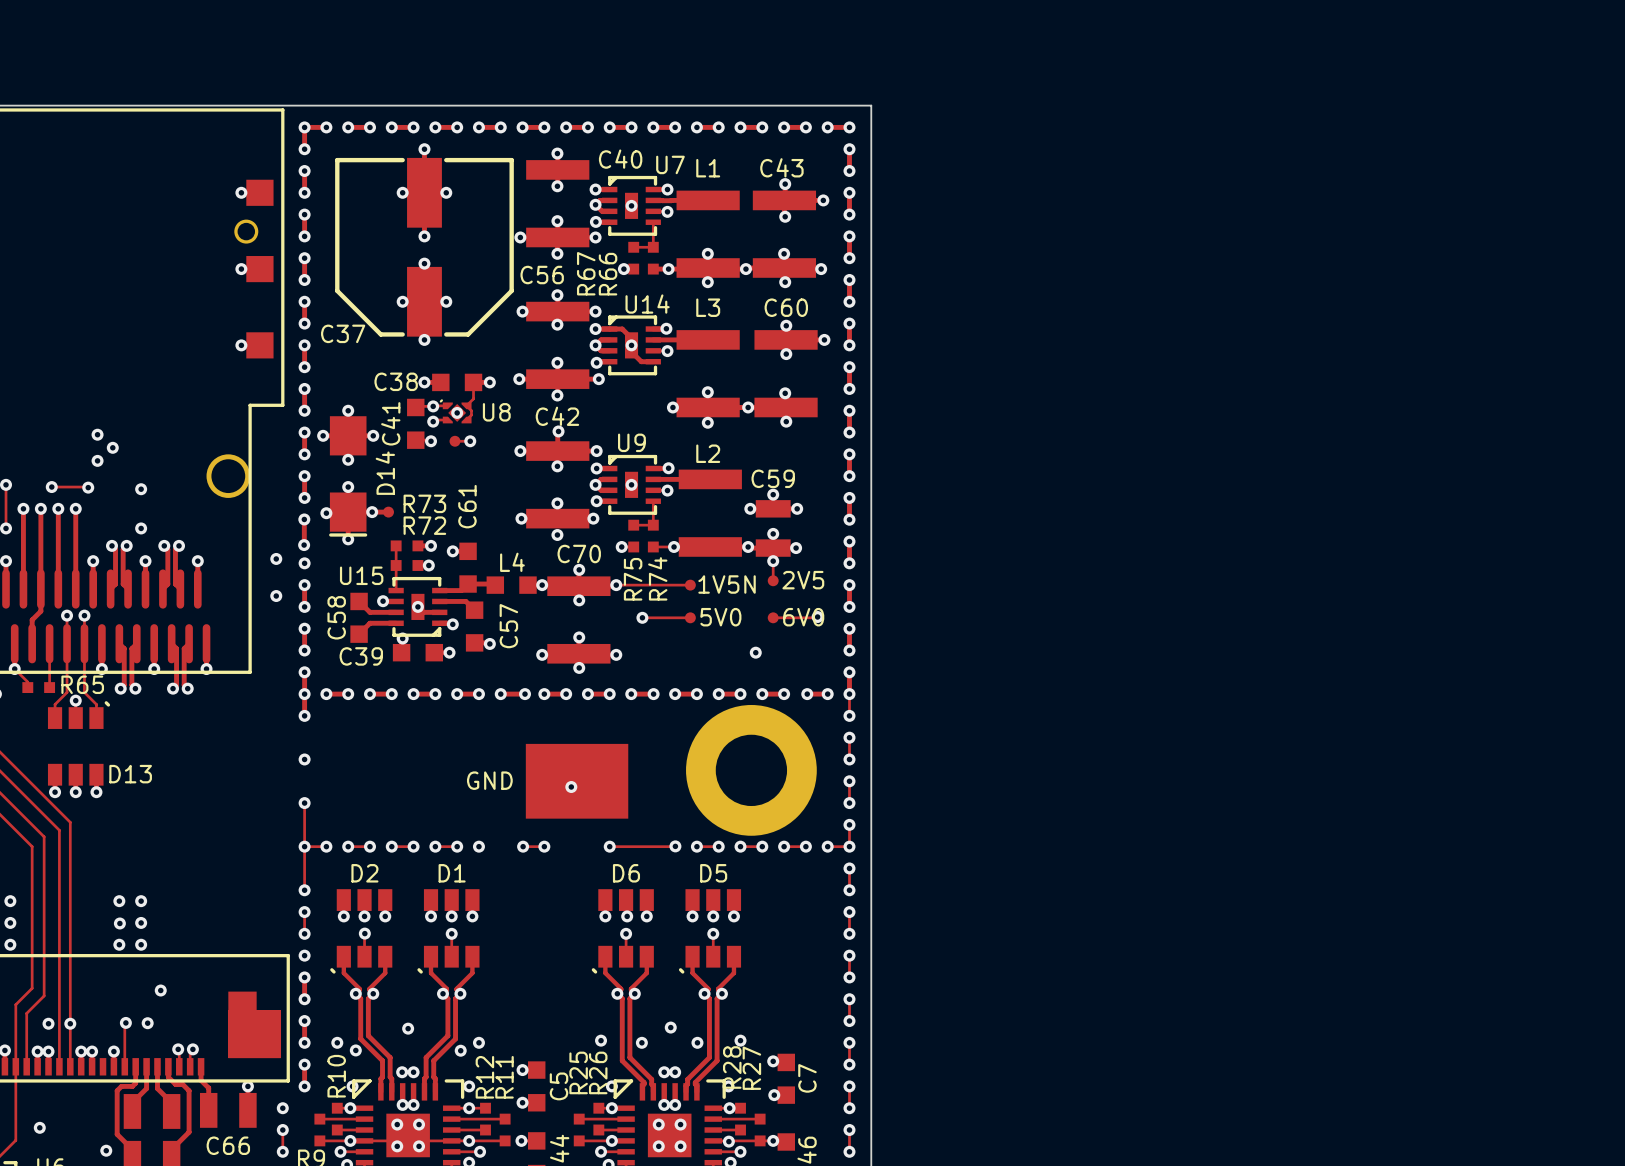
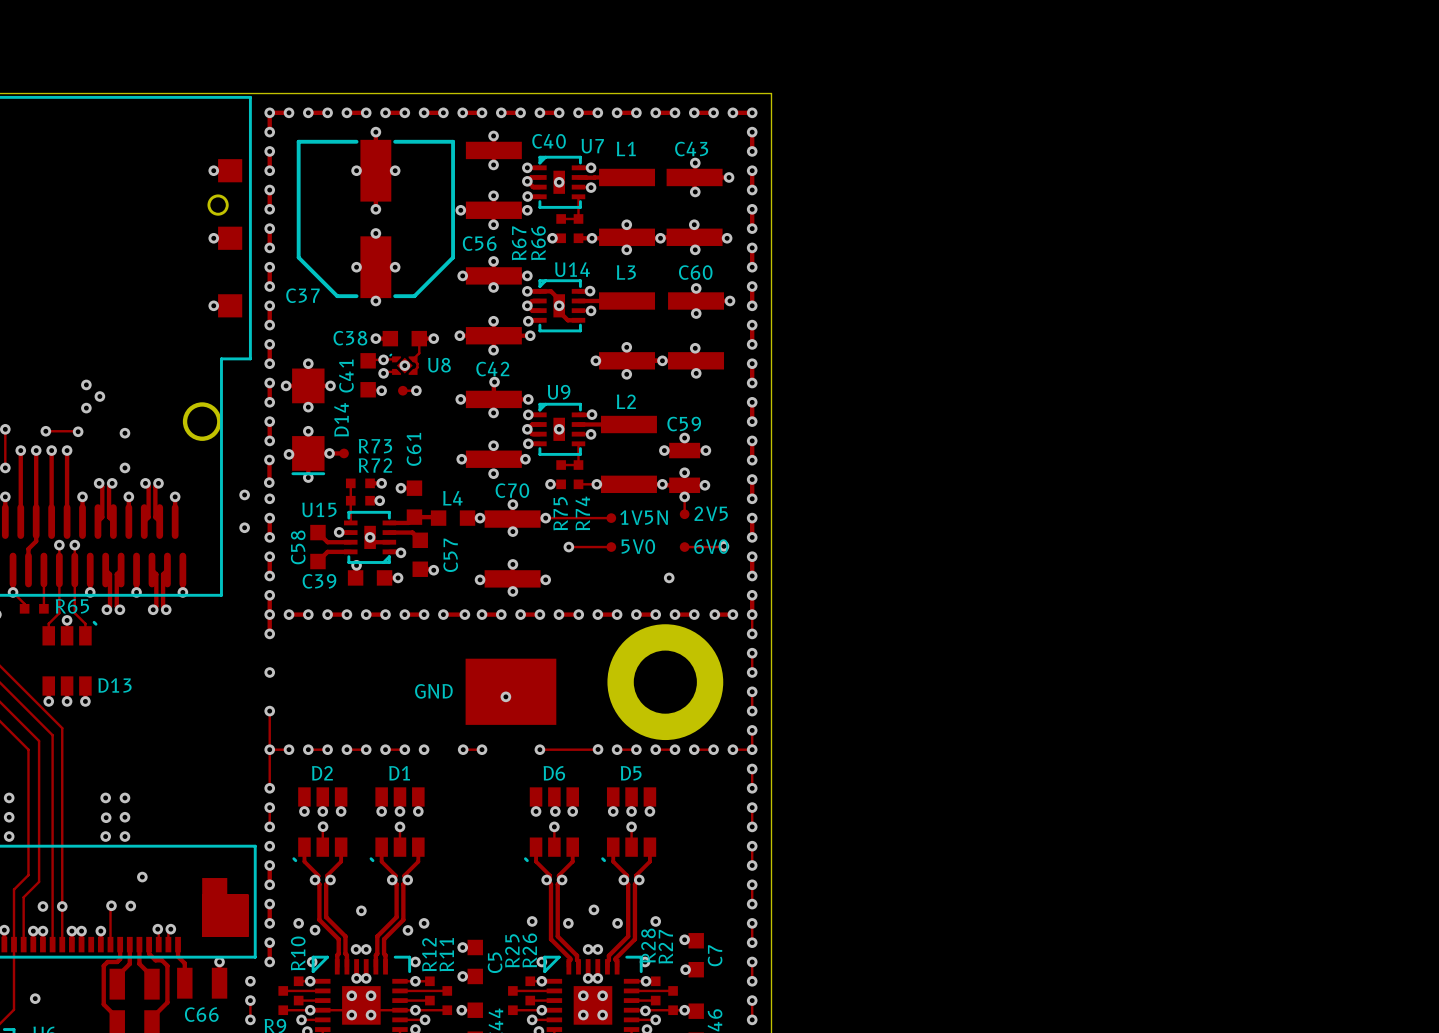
via: (106, 1150) -> none

